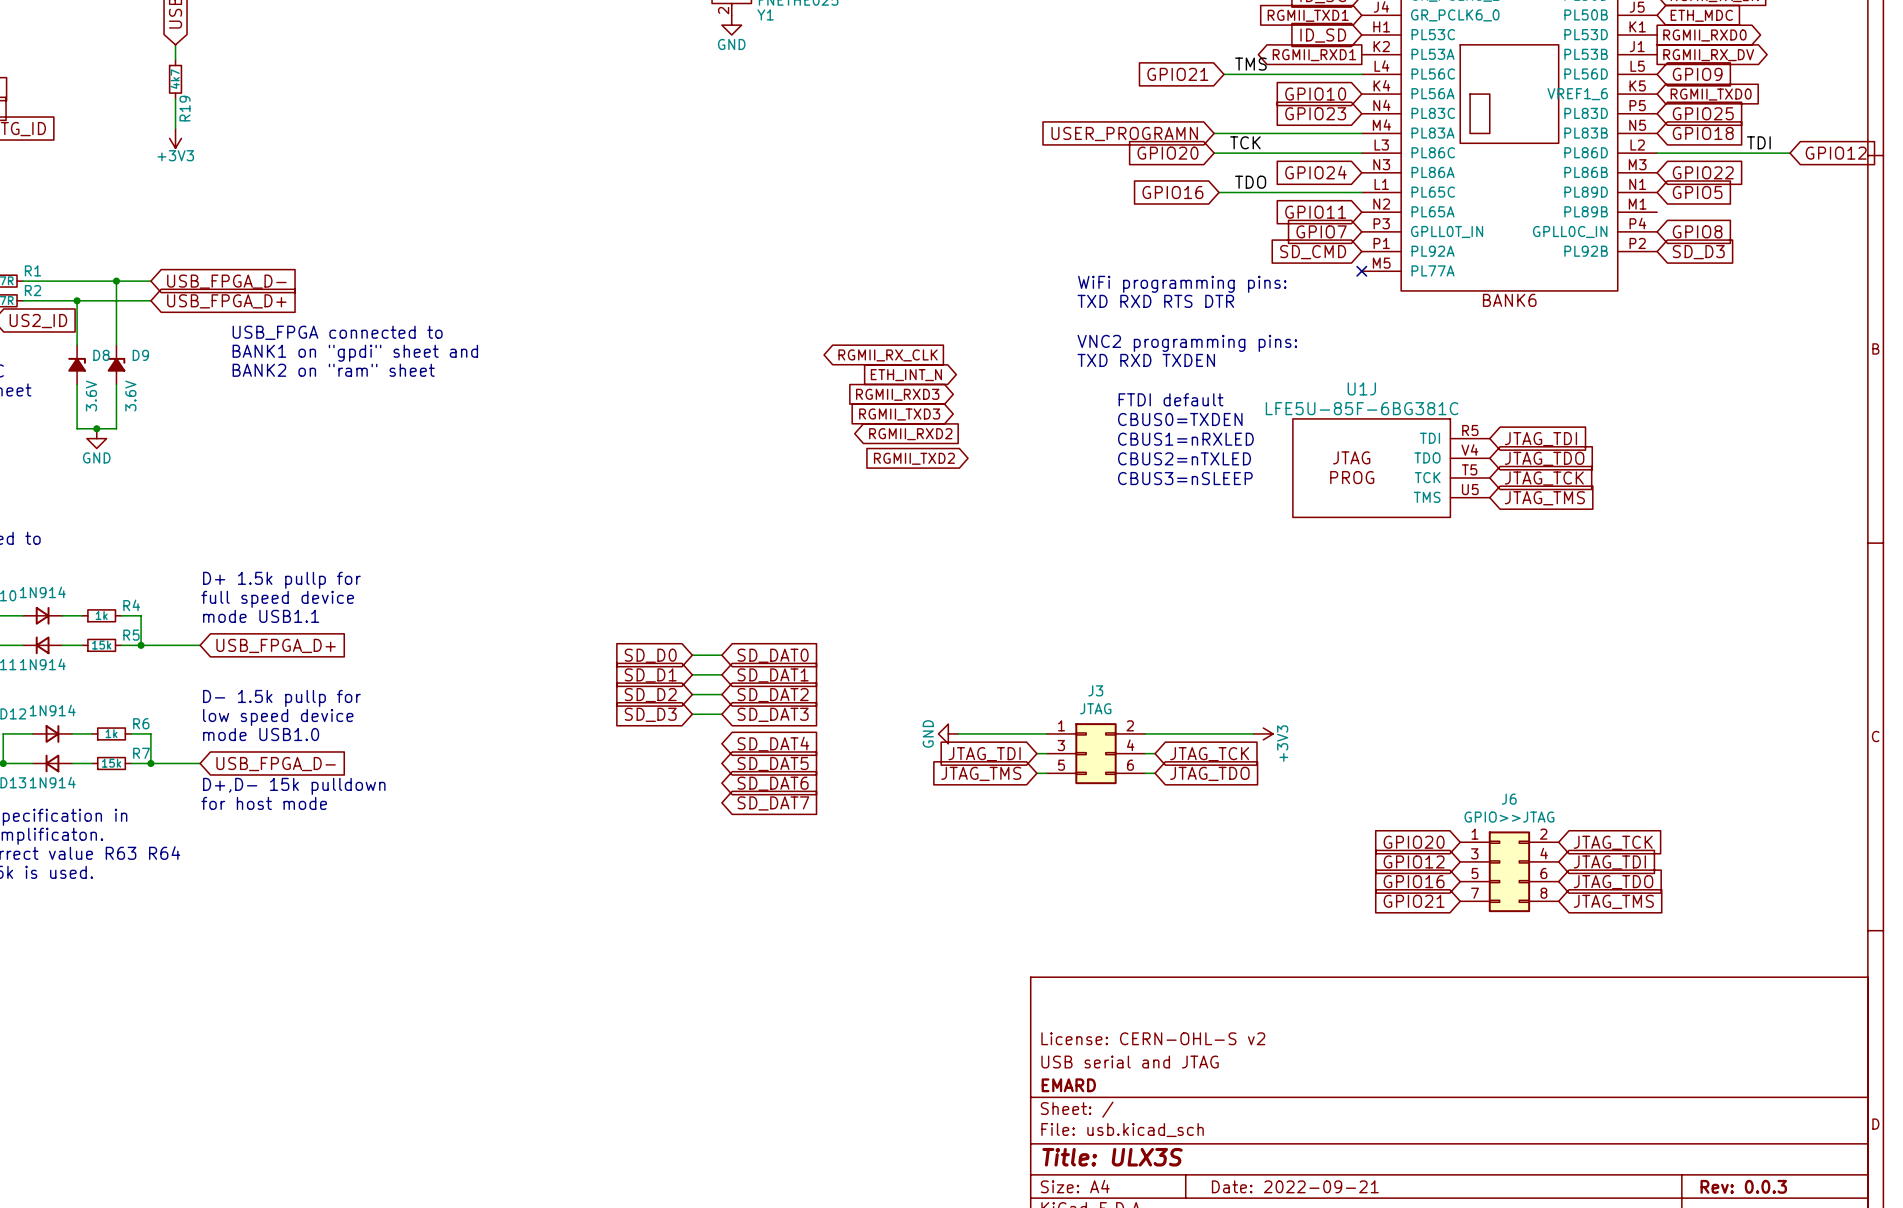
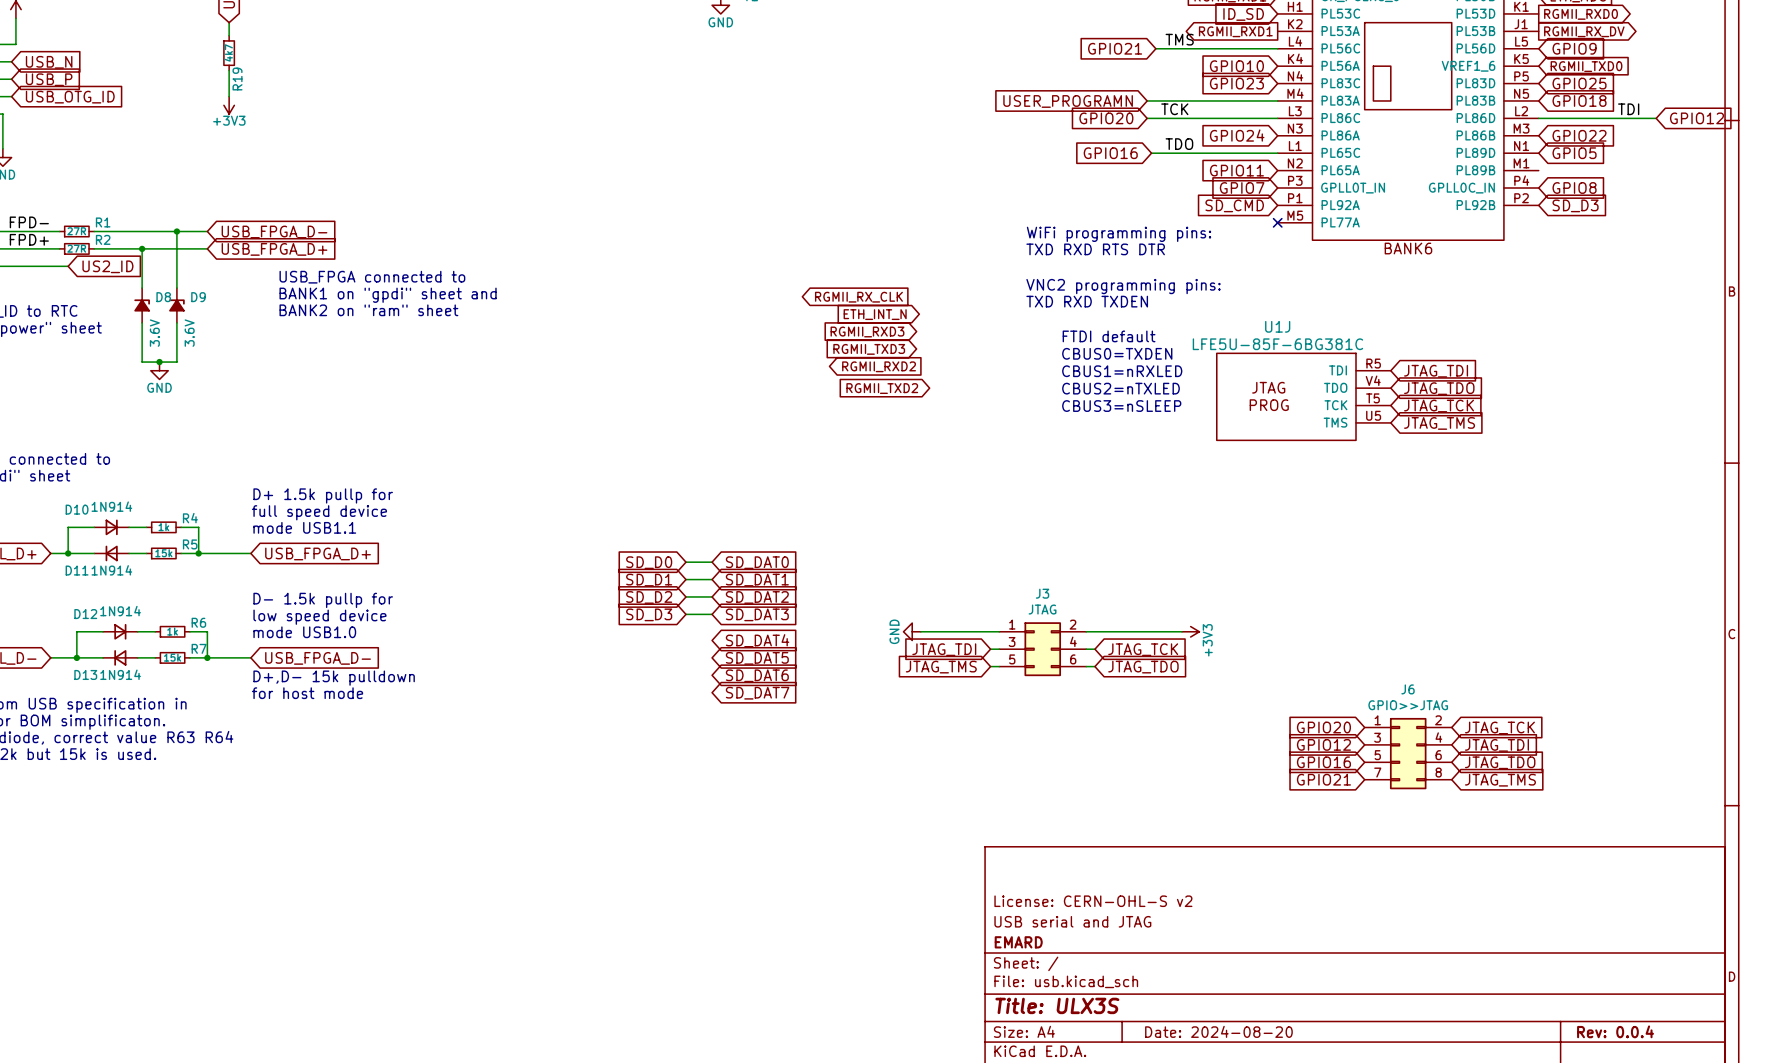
title block: Date: 2022-09-21 (1295, 1186) -> Date: 2024-08-20 (1218, 1031)
title block: Rev: 0.0.3 (1743, 1186) -> Rev: 0.0.4 (1615, 1031)

